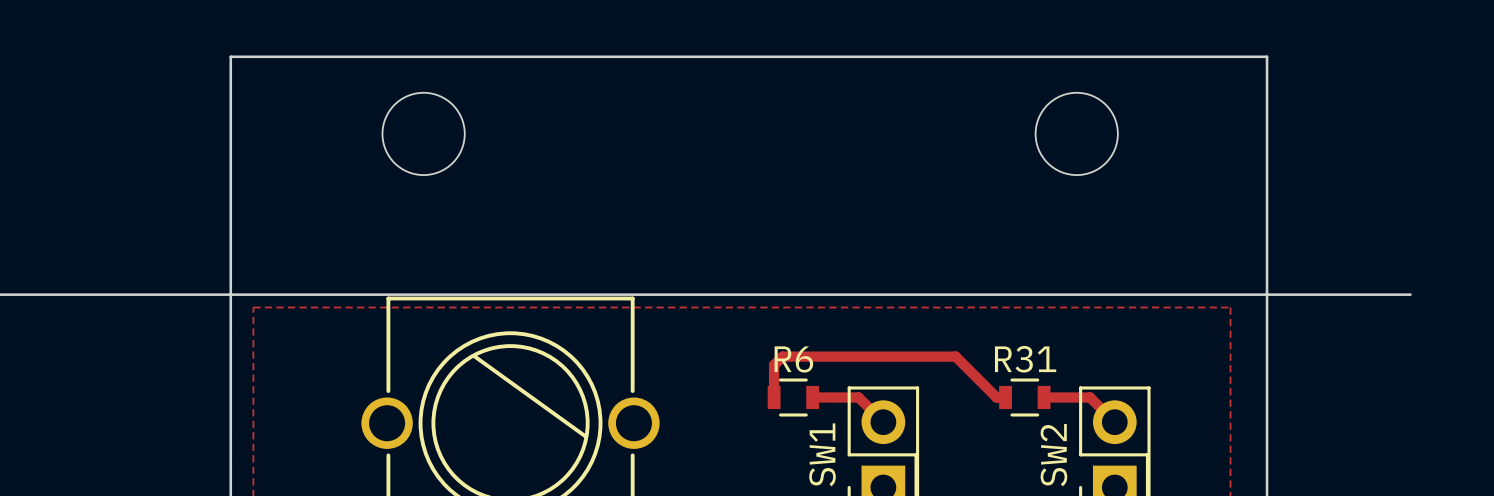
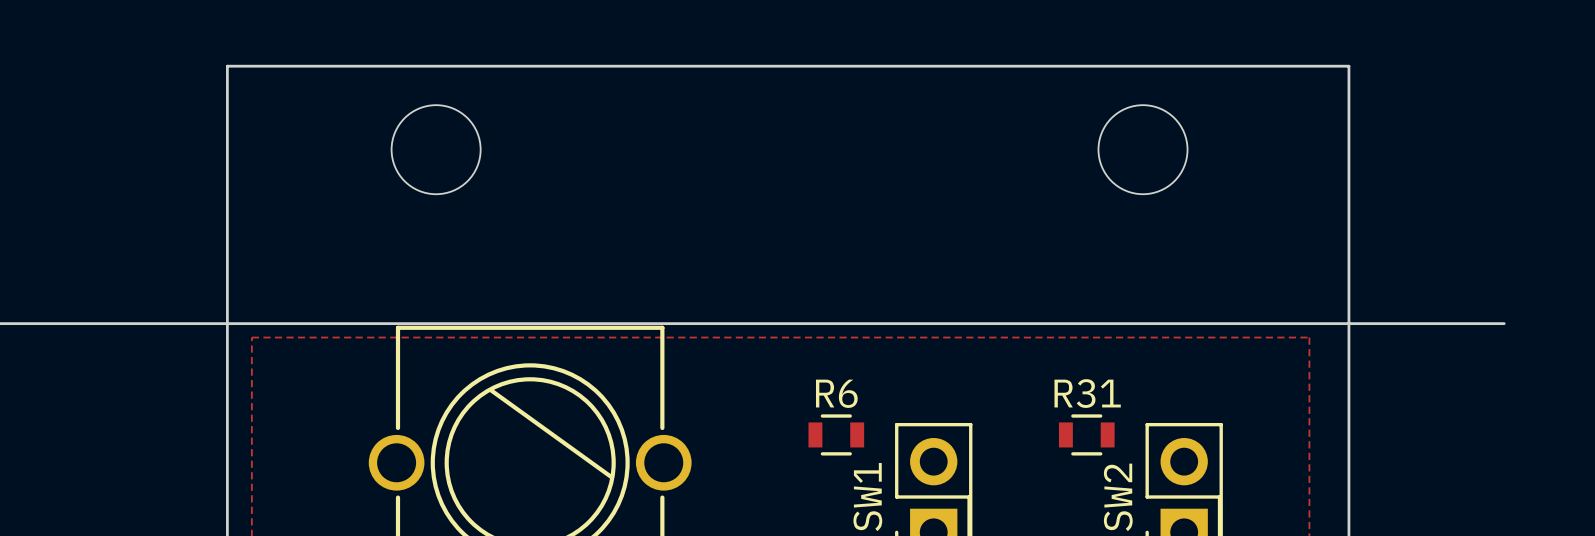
track: (774, 397) (774, 365) (782, 356) (955, 356) (996, 397) (1005, 397) -> none
track: (812, 397) (858, 397) (883, 422) -> none
track: (1044, 397) (1090, 397) (1114, 422) -> none

